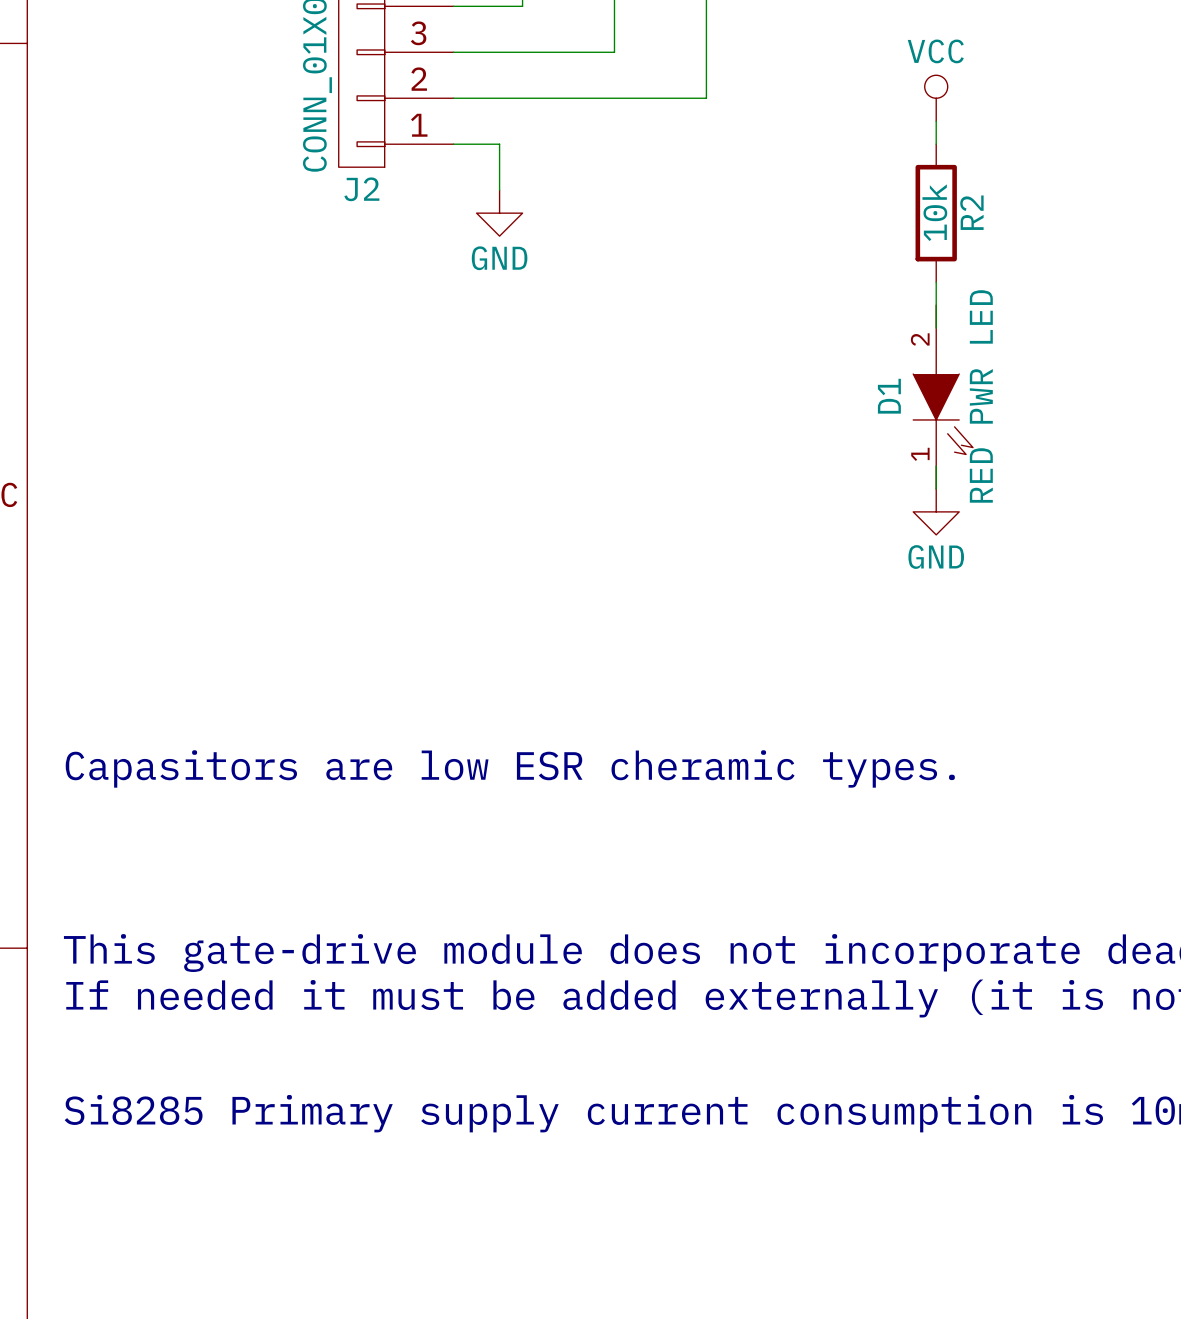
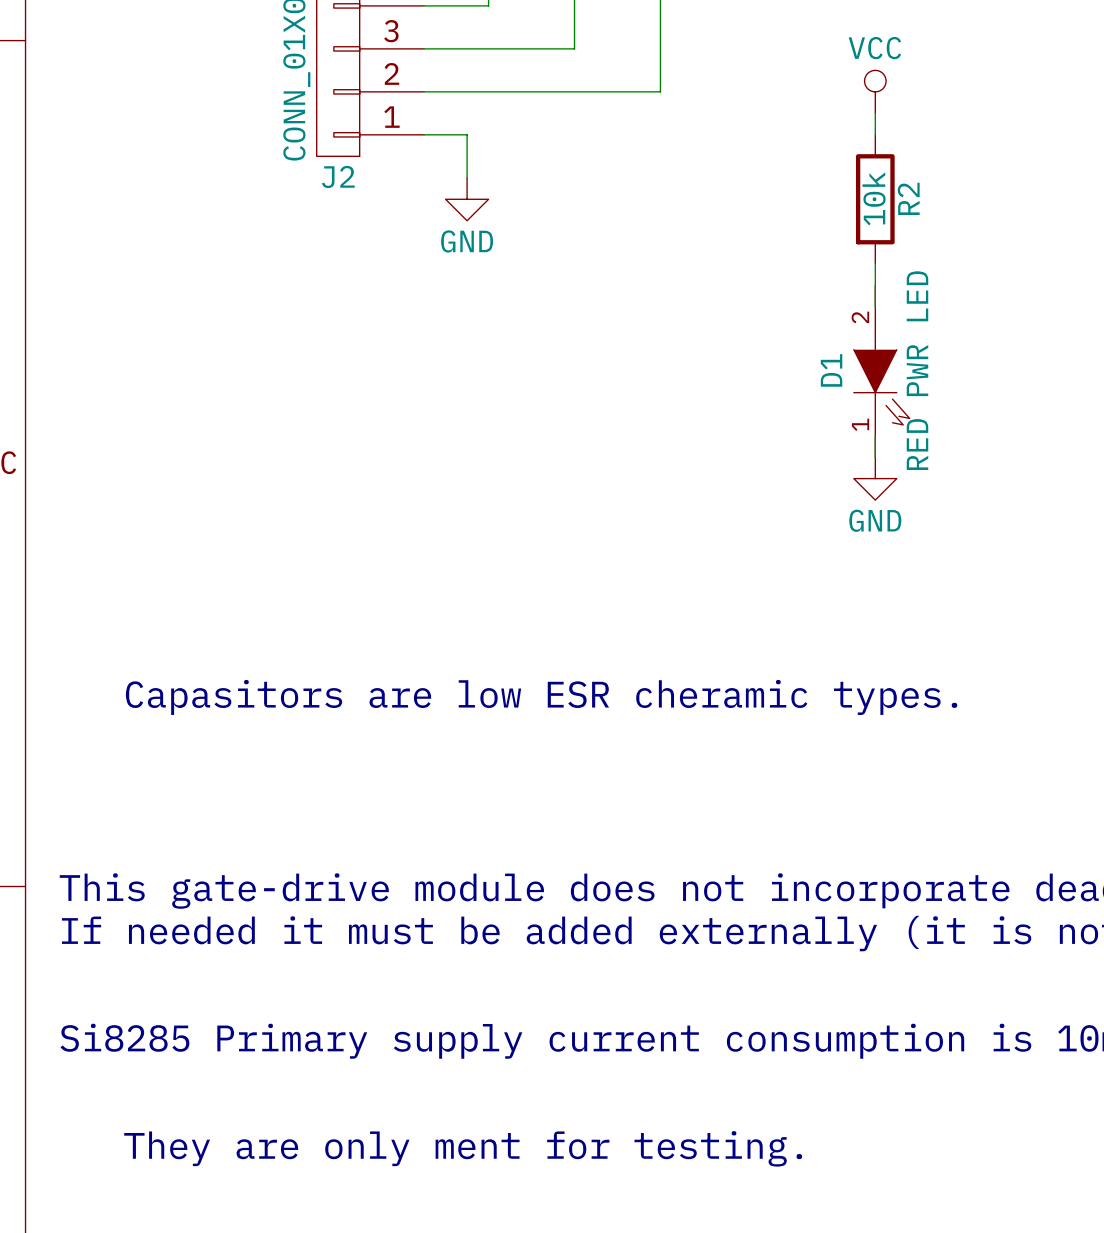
text position: Capasitors are low ESR cheramic types. (510, 768) -> Capasitors are low ESR cheramic types. (541, 697)
text: none -> They are only ment for testing. (463, 1148)

